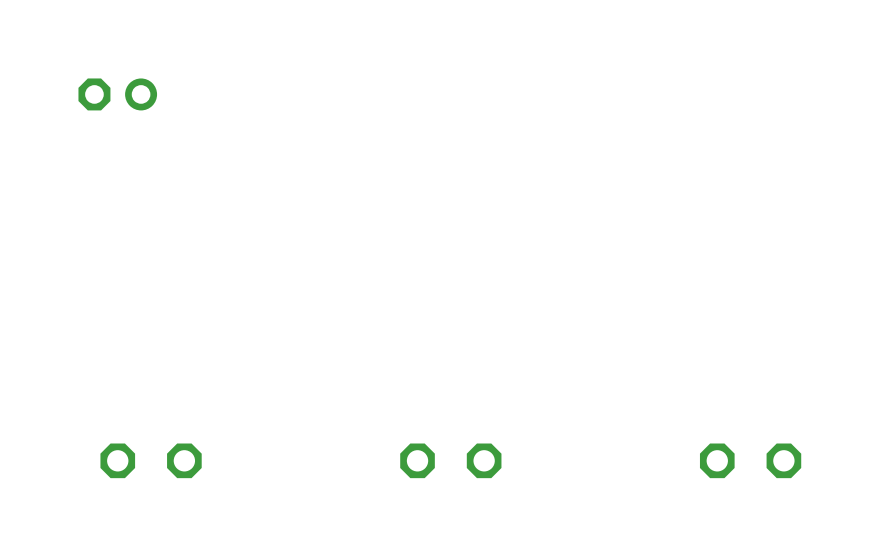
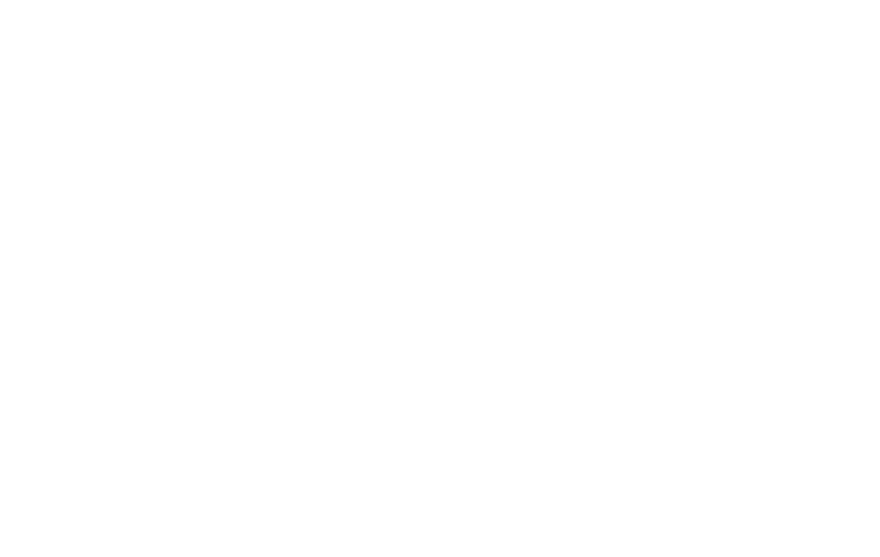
part: (117, 94) -> none
part: (151, 460) -> none
part: (450, 460) -> none
part: (750, 460) -> none

